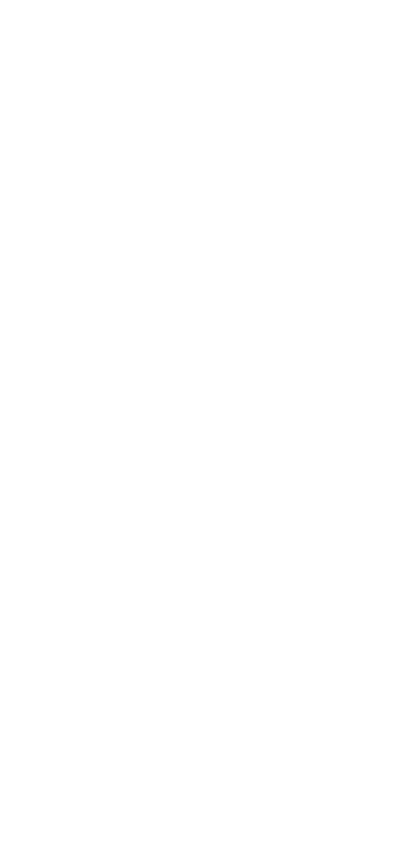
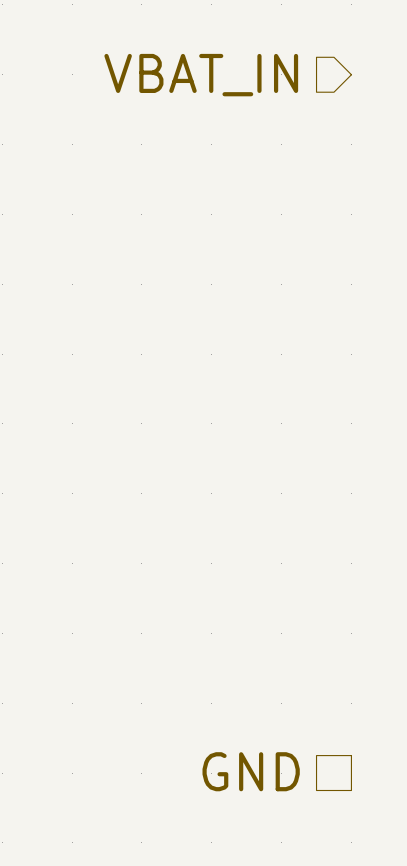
hierarchical label: none -> VBAT_IN (201, 75)
hierarchical label: none -> GND (251, 771)

